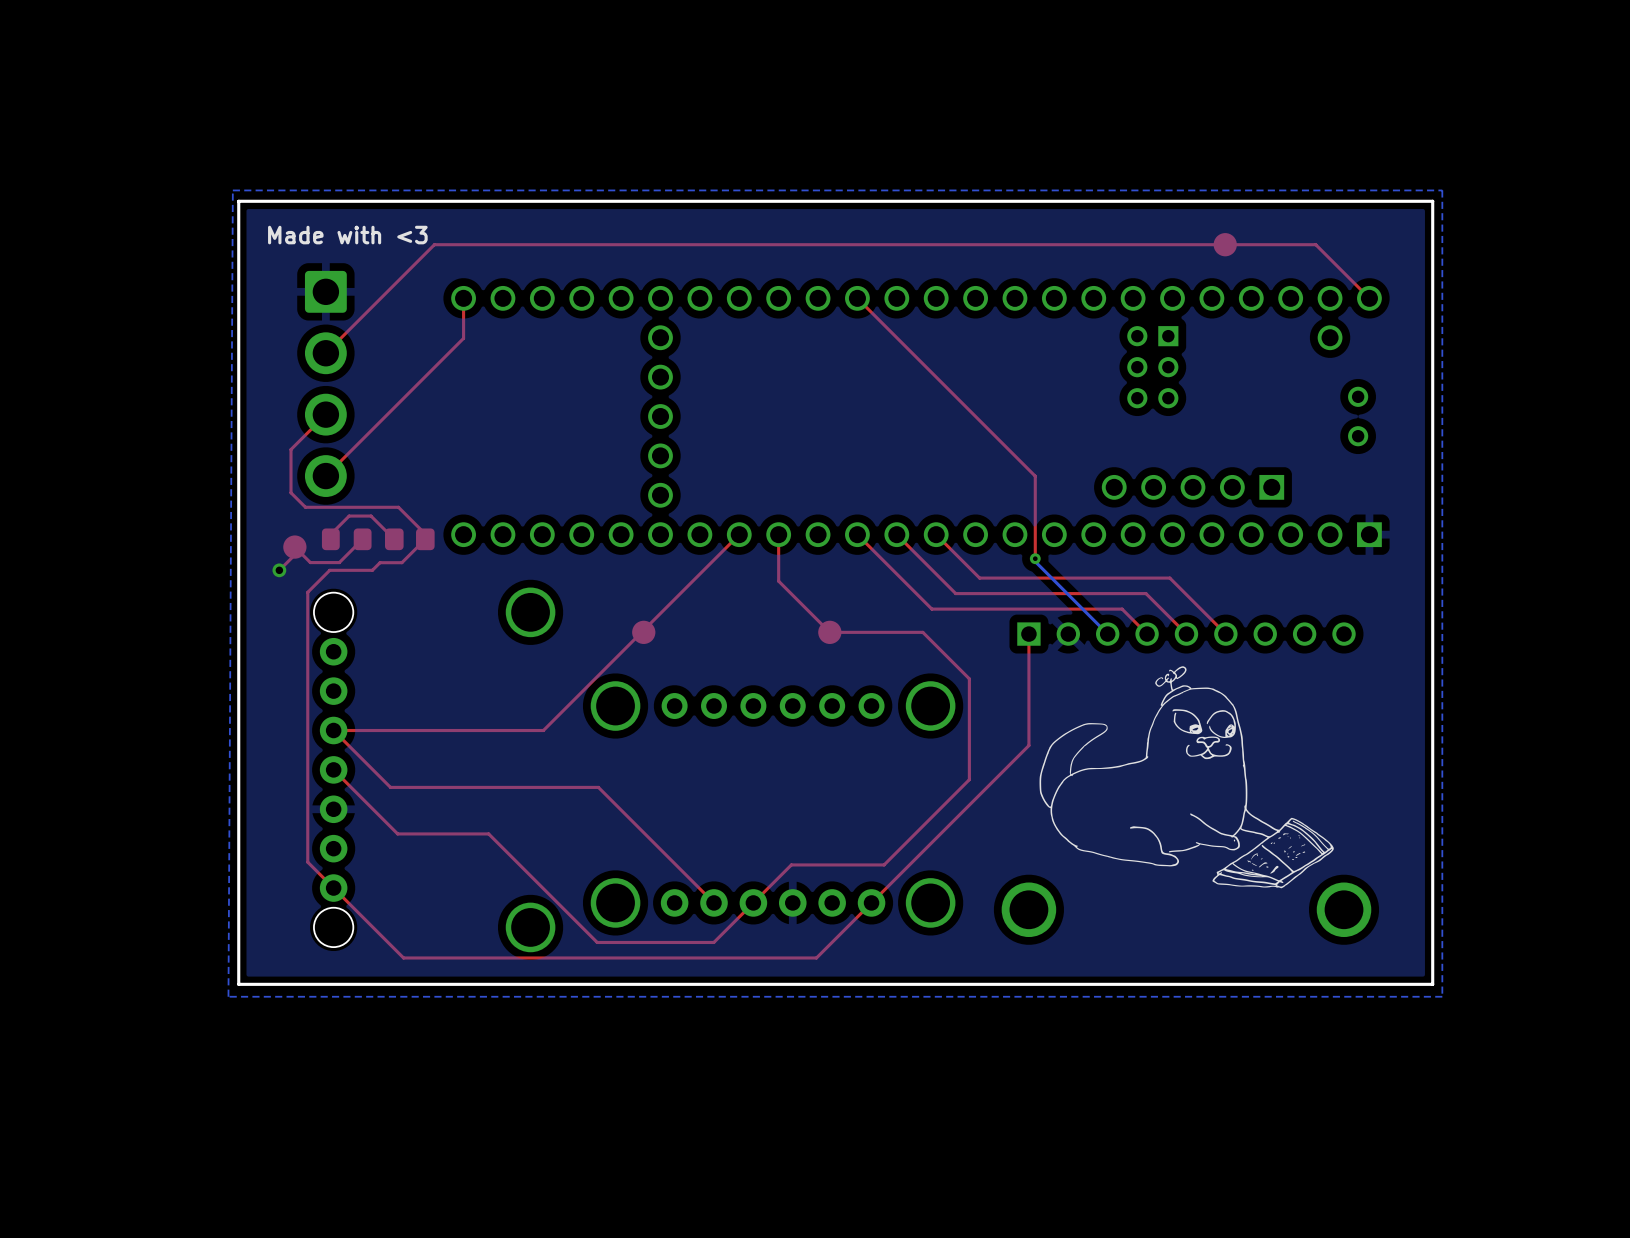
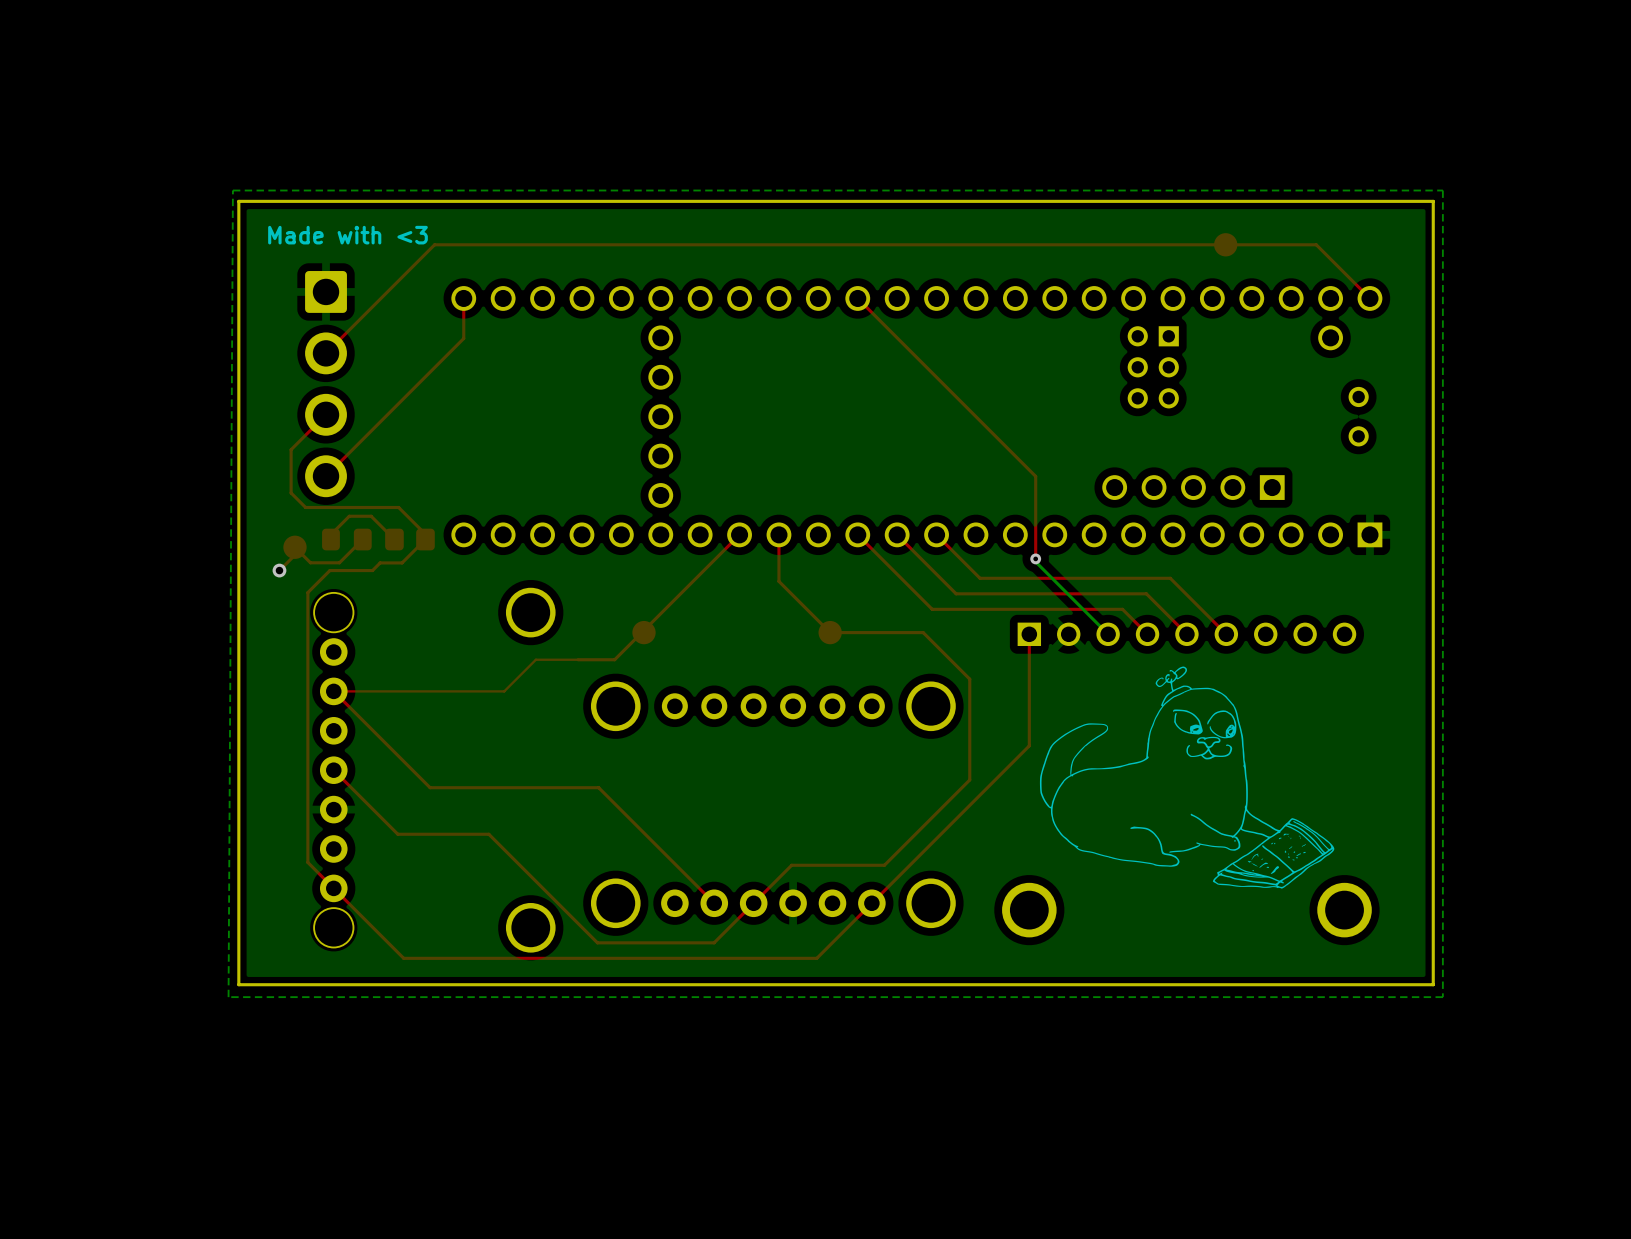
top track: (614, 659) (543, 730) (333, 730) (390, 787) (429, 787) -> (614, 659) (535, 659) (504, 691) (333, 691) (430, 787)

